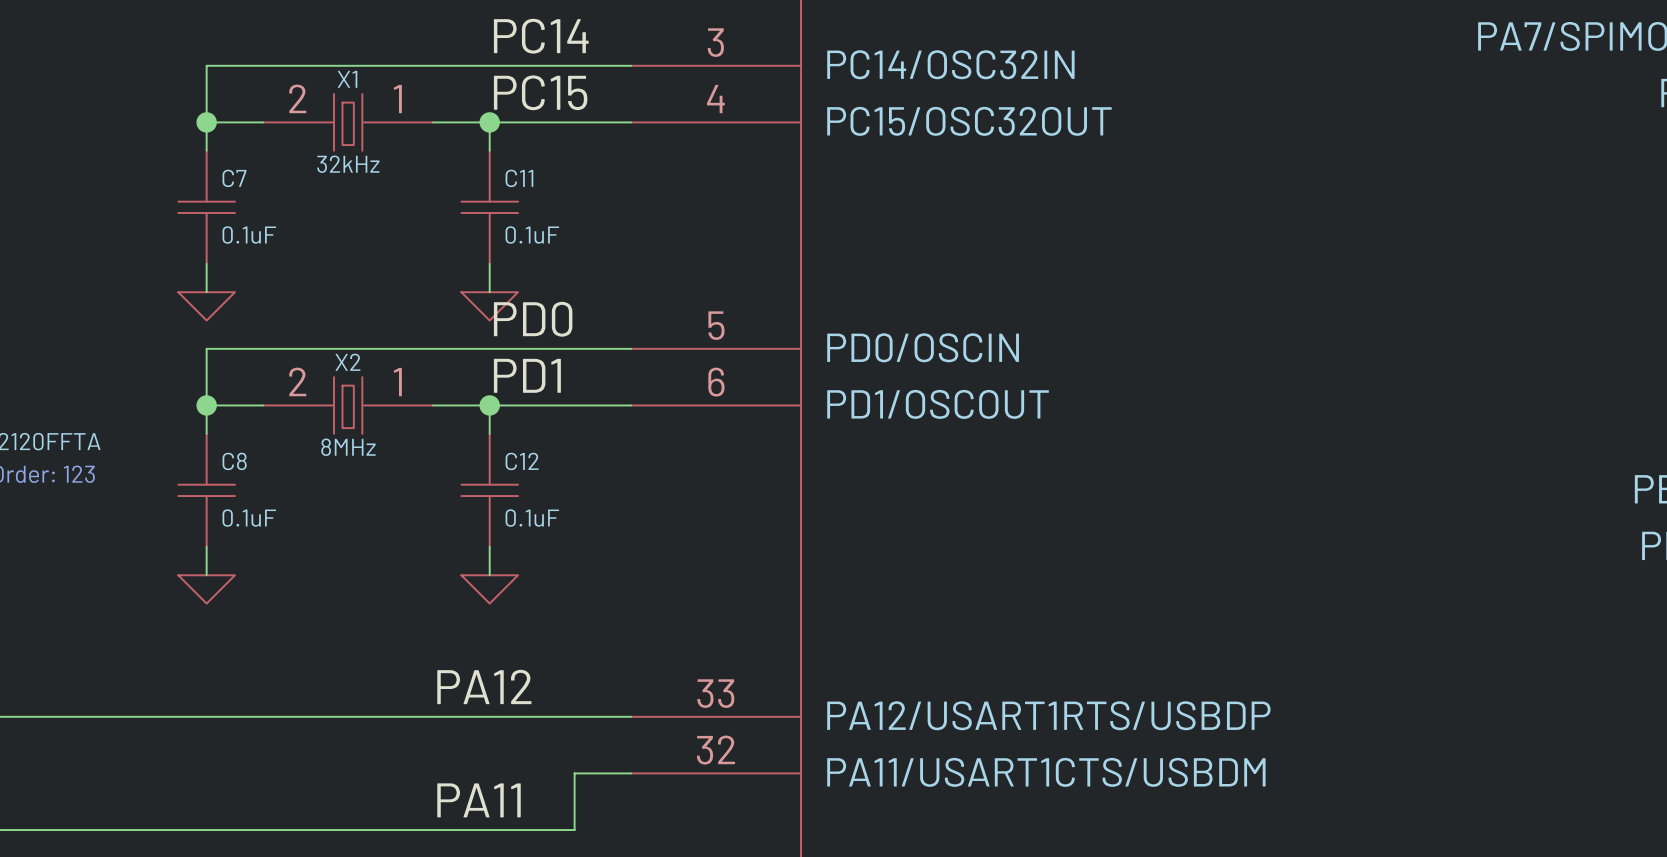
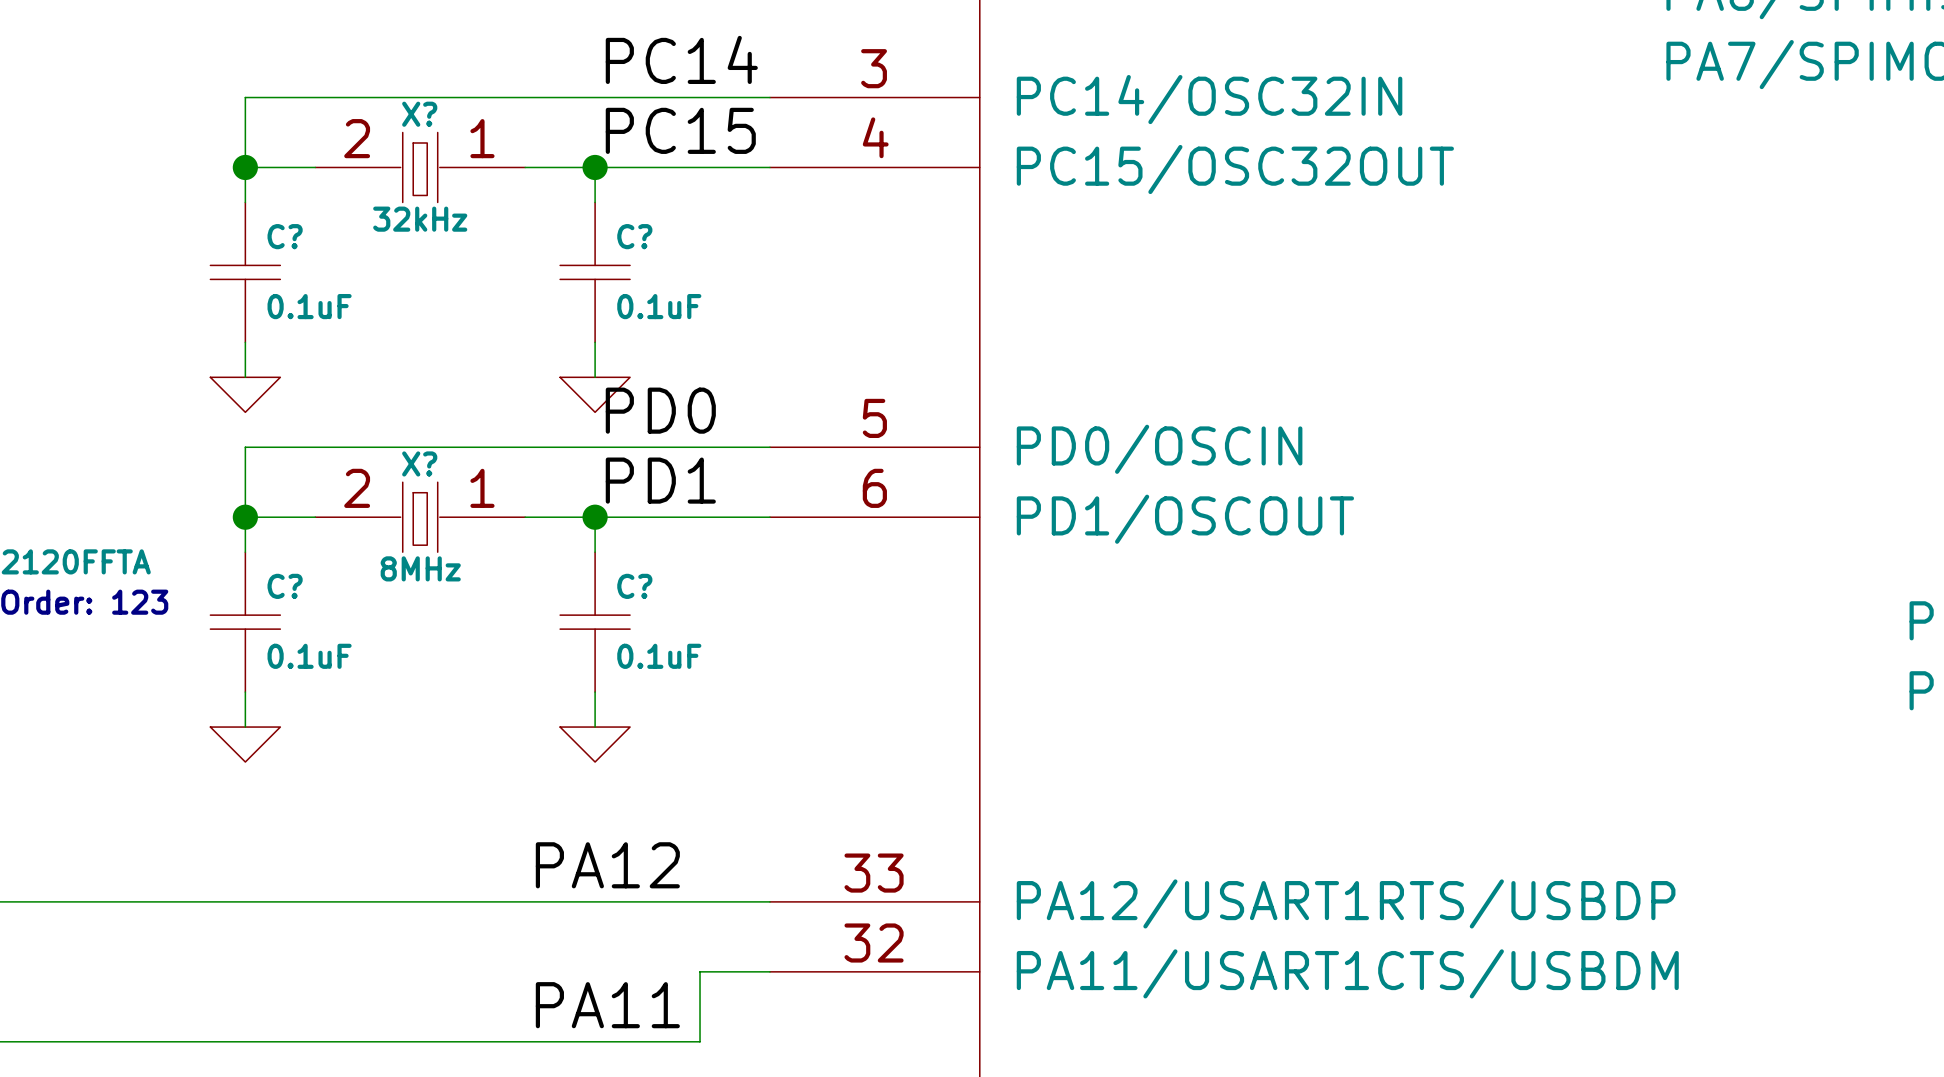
X1 name: X1 (347, 79) -> X? (419, 114)
C7 name: C7 (234, 178) -> C? (285, 236)
C11 name: C11 (519, 178) -> C? (634, 236)
X2 name: X2 (347, 362) -> X? (419, 463)
C8 name: C8 (234, 461) -> C? (285, 586)
C12 name: C12 (522, 461) -> C? (634, 586)

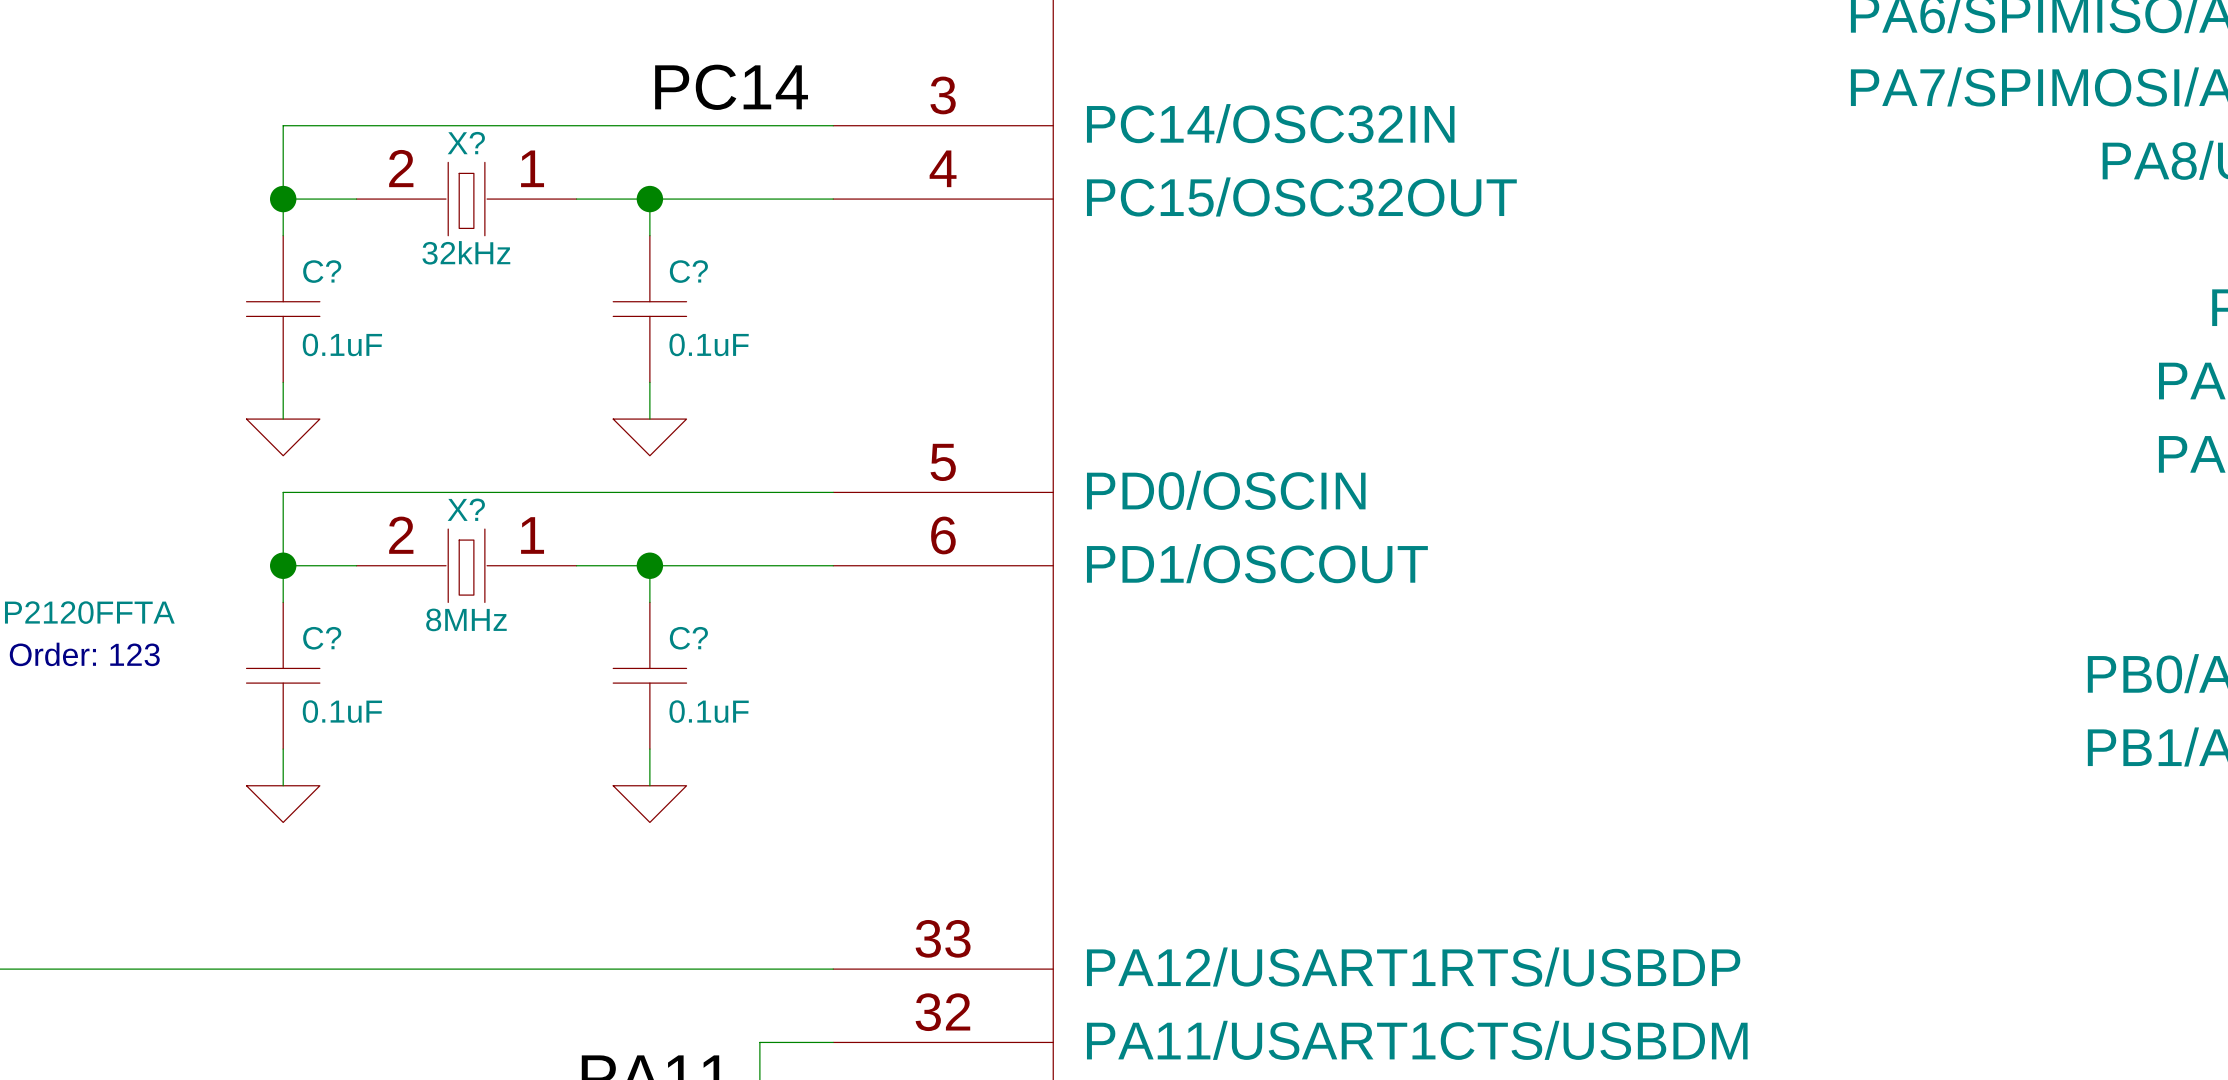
label: PC15 (680, 130) -> none
label: PD0 (660, 410) -> none
label: PD1 (660, 480) -> none
label: PA12 (607, 865) -> none

